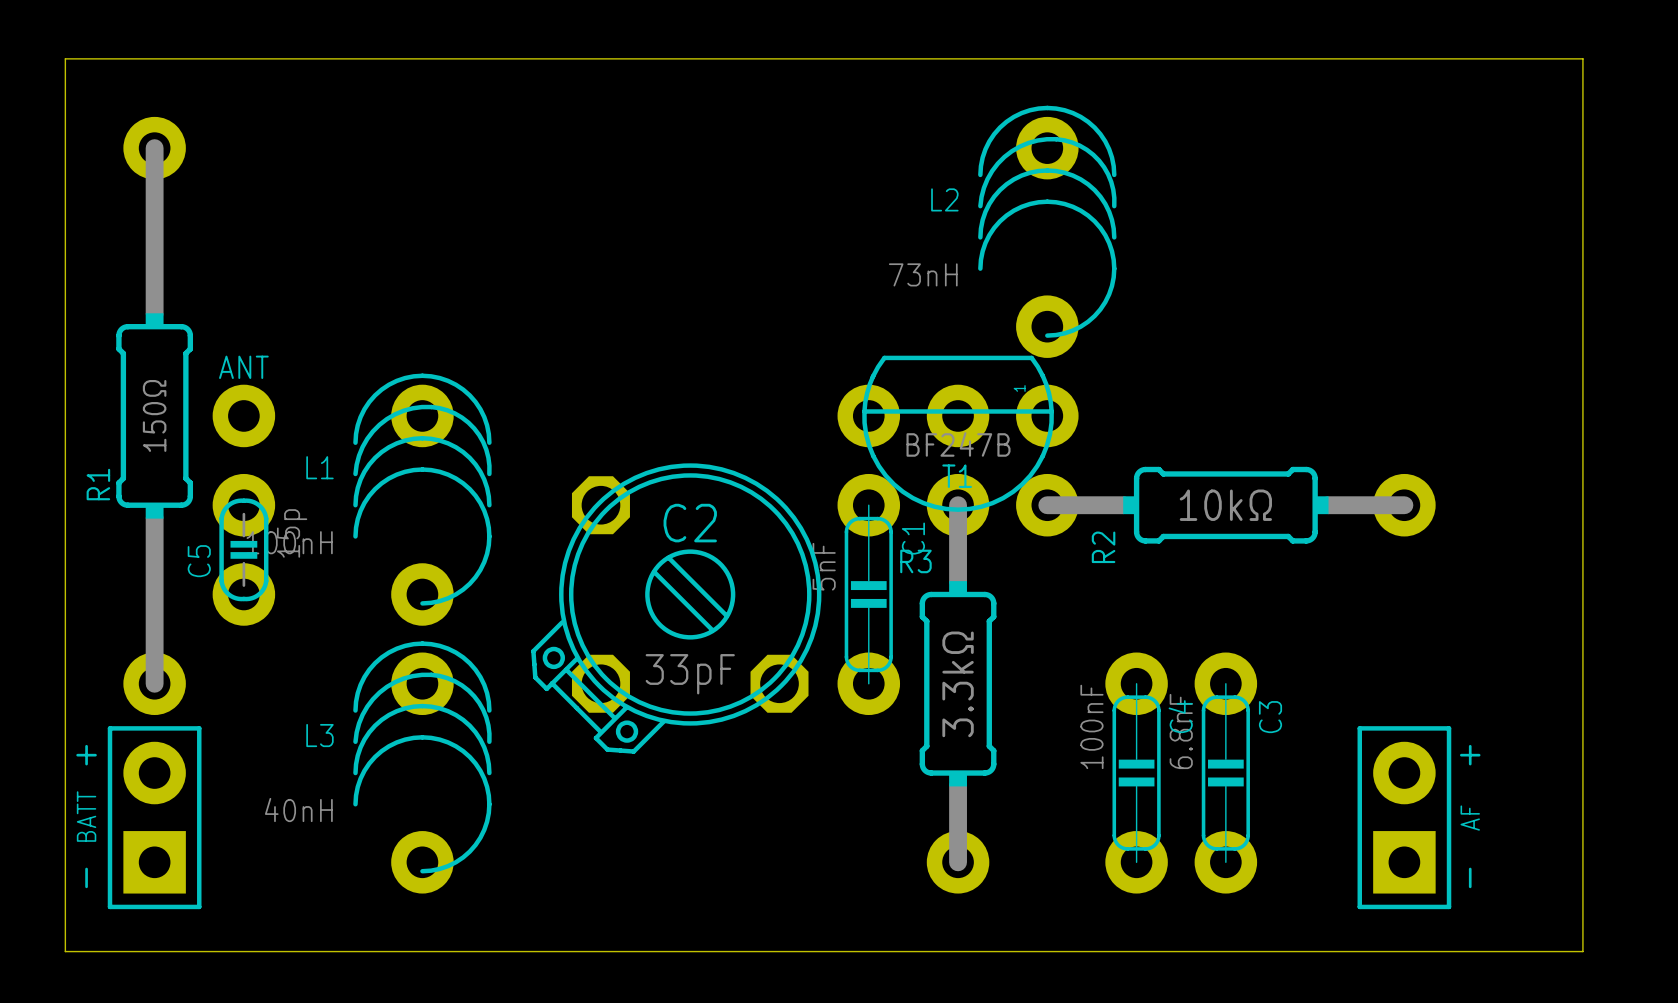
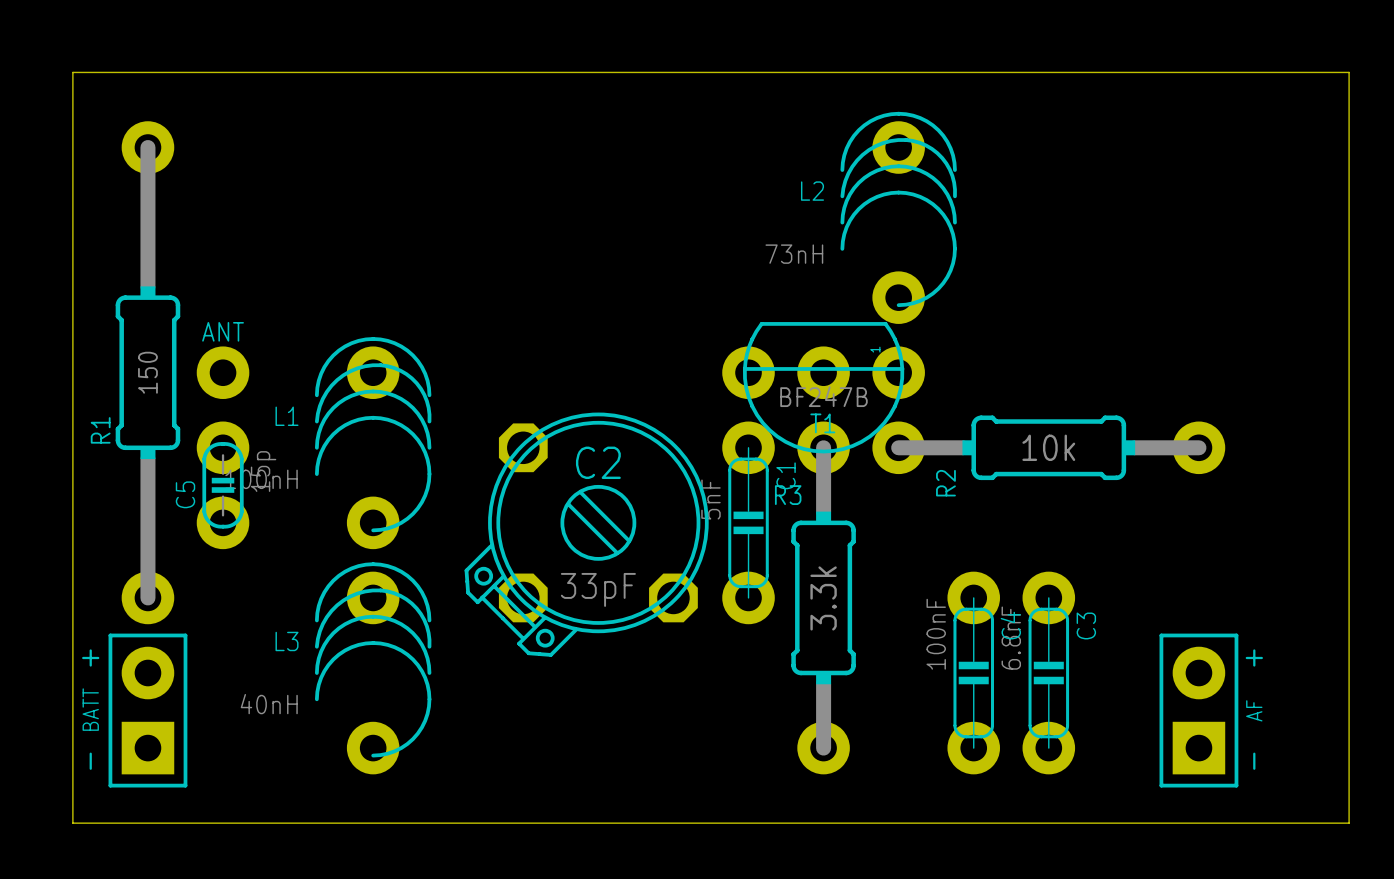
R1 value: 150Ω (154, 415) -> 150 (147, 372)
R2 value: 10kΩ (1225, 505) -> 10k (1048, 447)
R3 value: 3.3kΩ (958, 684) -> 3.3k (823, 598)

